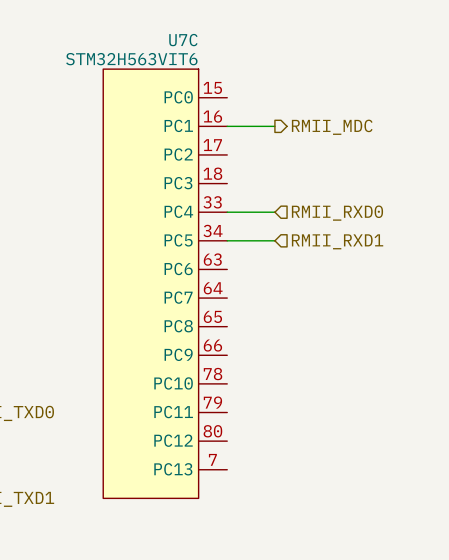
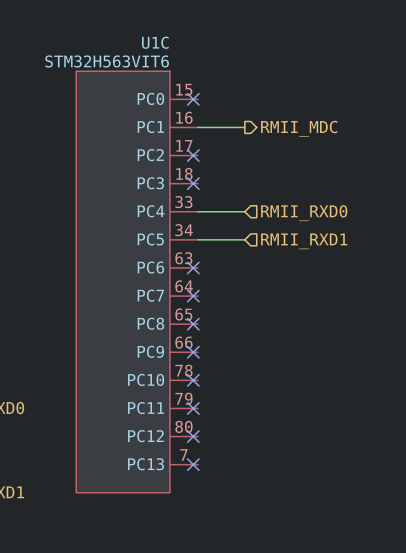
U7C name: U7C (183, 40) -> U1C (155, 42)
no-connect mark: none -> (193, 99)
no-connect mark: none -> (193, 155)
no-connect mark: none -> (193, 183)
no-connect mark: none -> (193, 267)
no-connect mark: none -> (193, 296)
no-connect mark: none -> (193, 324)
no-connect mark: none -> (193, 352)
no-connect mark: none -> (193, 380)
no-connect mark: none -> (193, 408)
no-connect mark: none -> (193, 436)
no-connect mark: none -> (193, 464)

